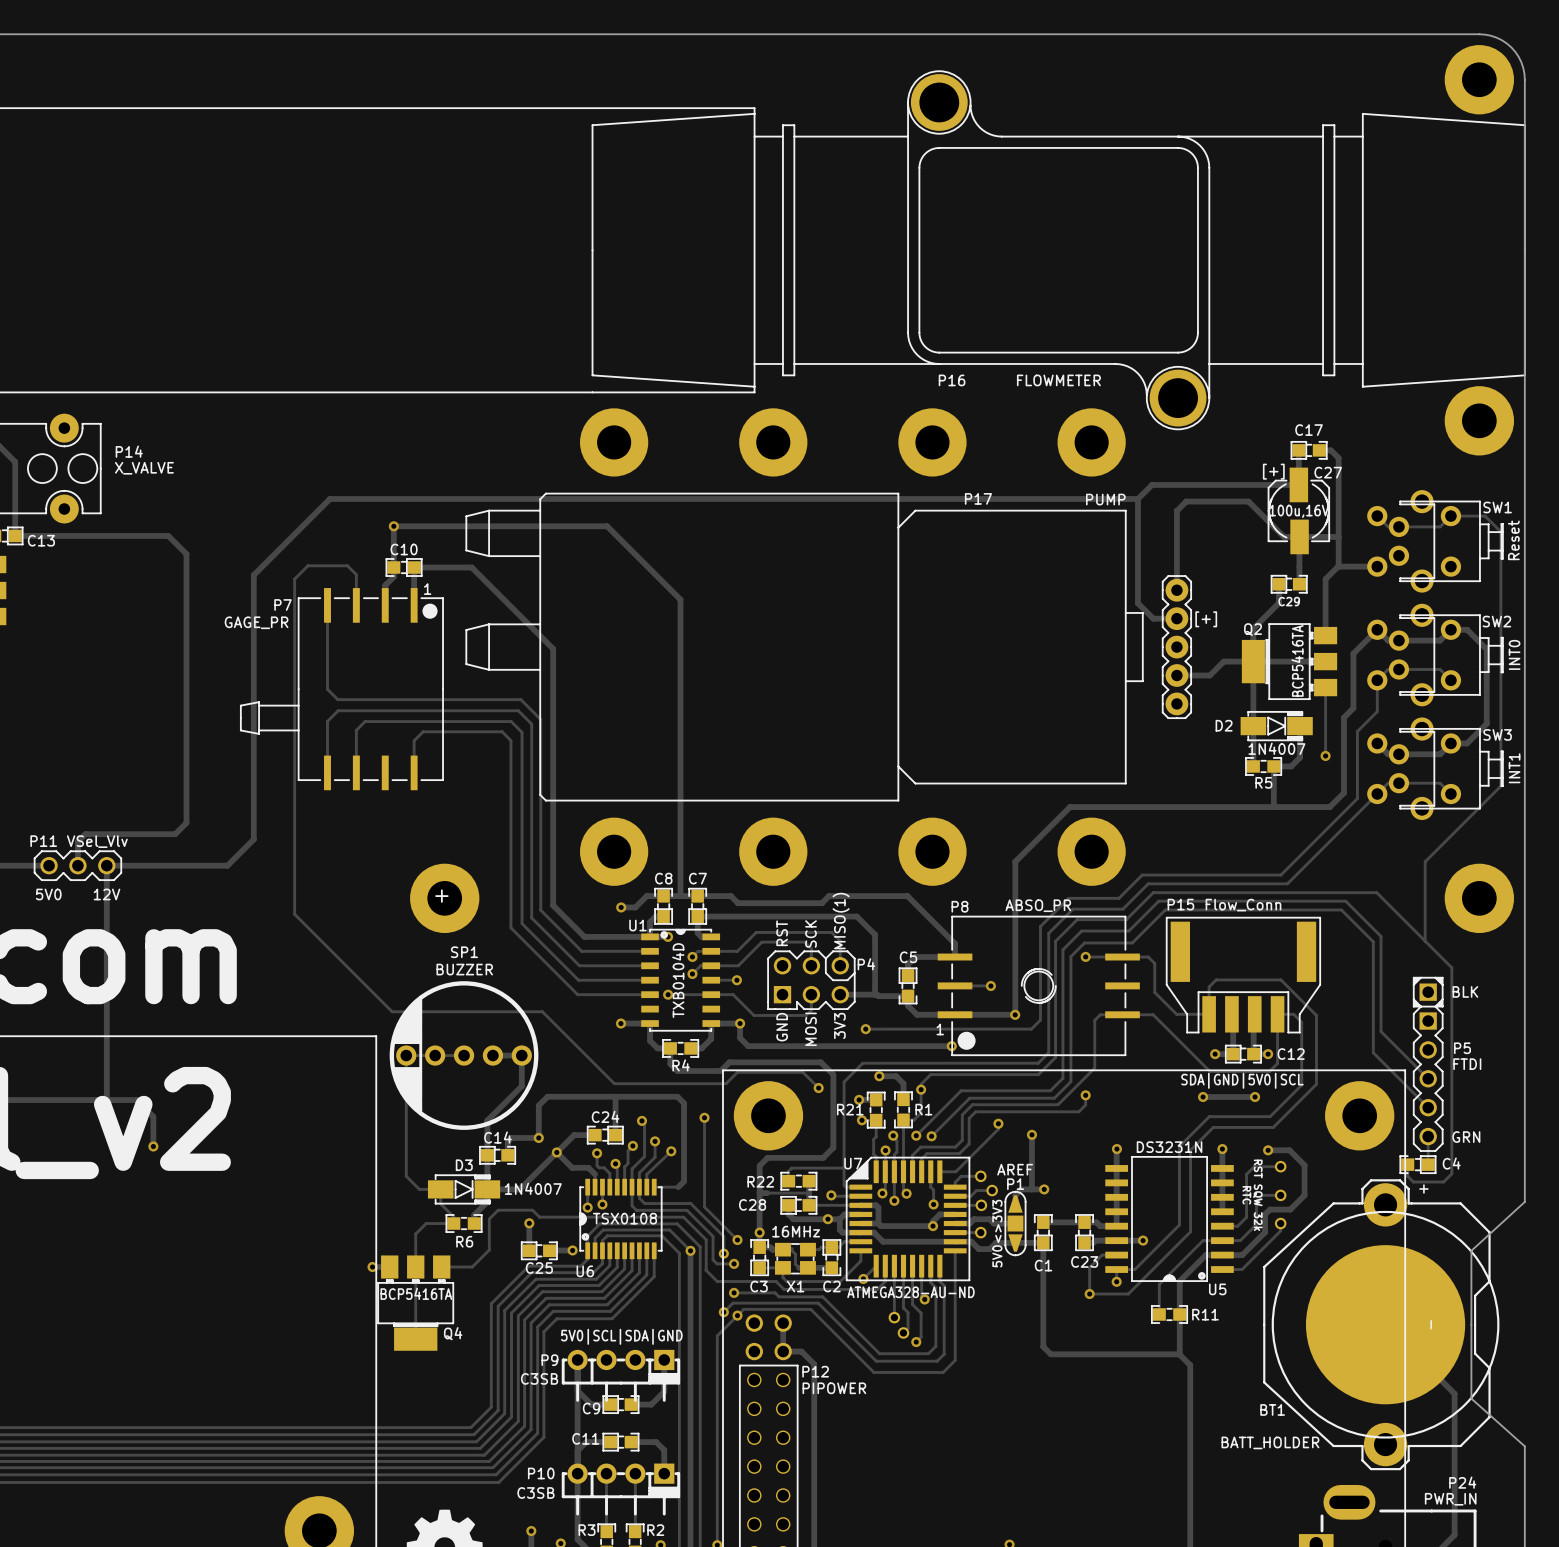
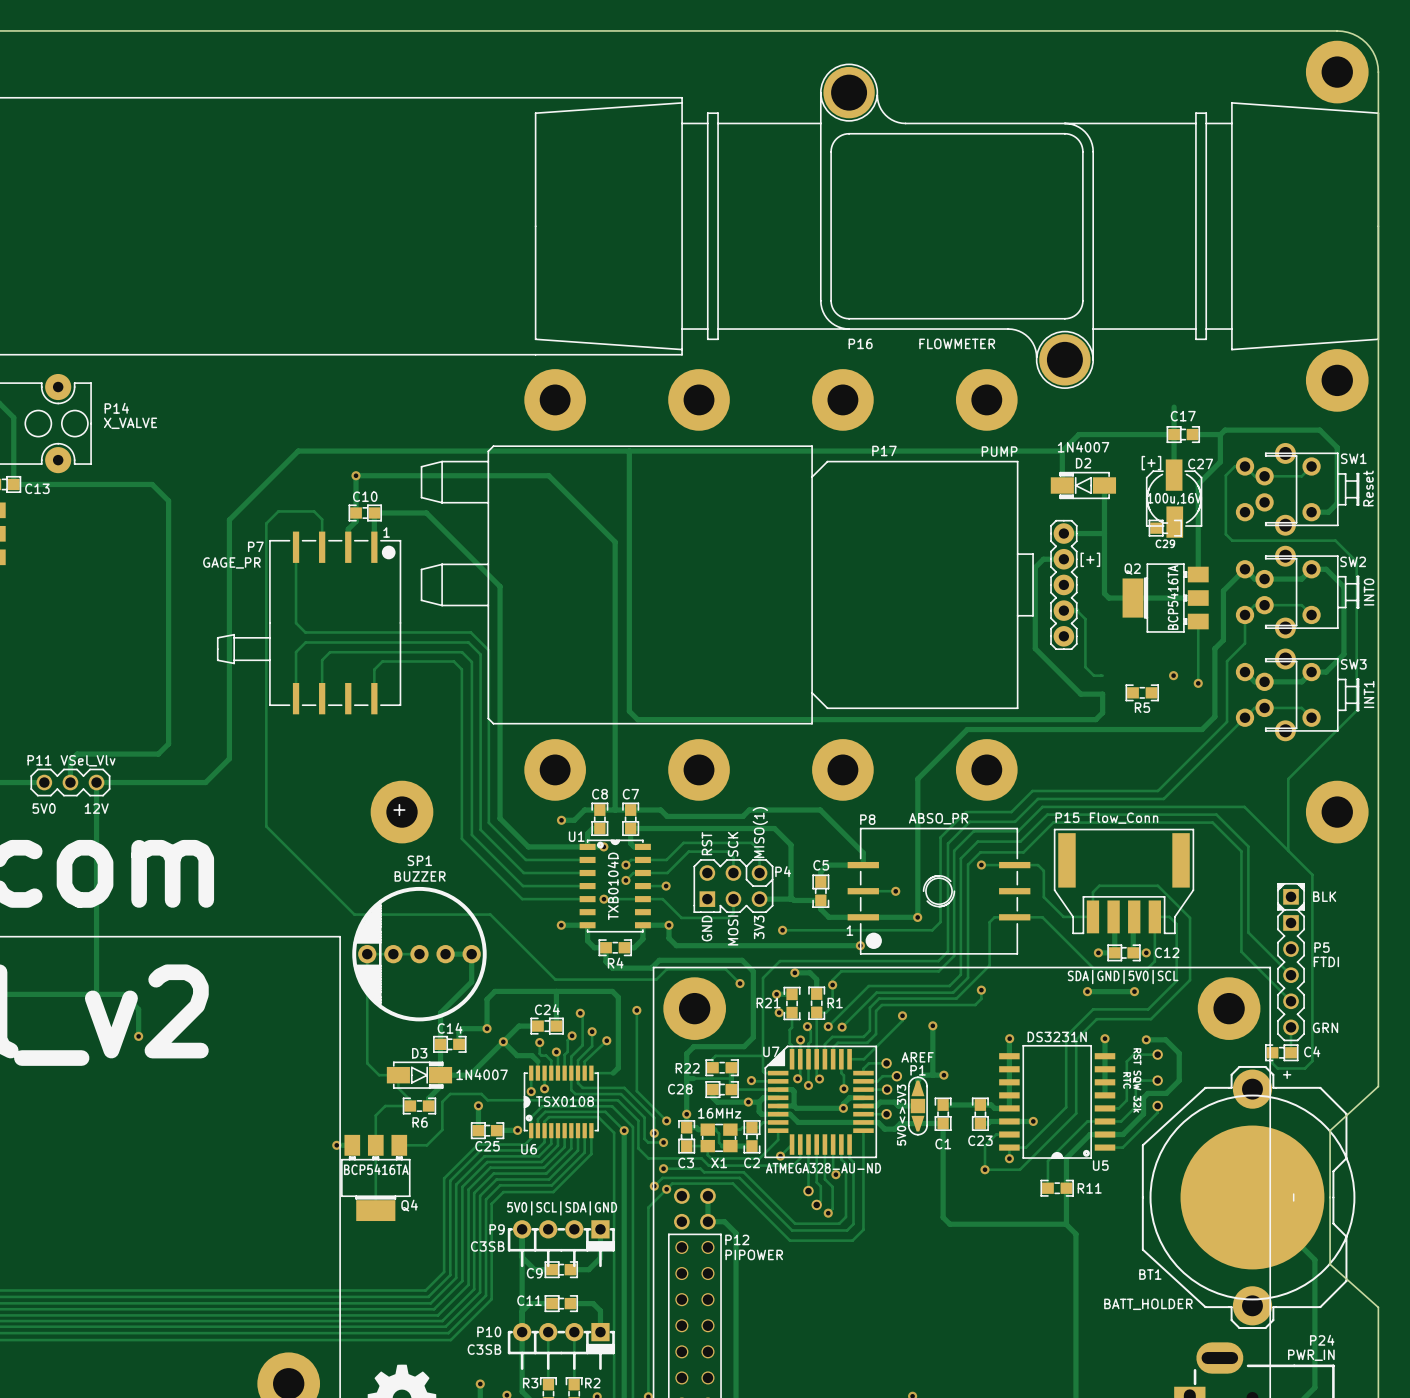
C17 position: (1309, 450) -> (1183, 434)
track: (1319, 450) (1330, 450) (1338, 458) (1338, 566) -> none
track: none -> (1192, 434) (1220, 434) (1225, 430) (1319, 430) (1337, 447) (1337, 503) (1328, 512) (1311, 512)
track: (1298, 484) (1152, 484) (1137, 498) (1137, 603) (1154, 618) -> (629, 451) (629, 711) (637, 719) (1095, 719) (1102, 712) (1102, 694) (1080, 694) (1035, 648) (1035, 567) (1043, 559)
track: none -> (1028, 451) (1062, 451)
track: none -> (1062, 451) (1063, 487)
track: none -> (1062, 451) (1078, 434) (1174, 434) (1174, 475)
C27 position: (1298, 510) -> (1174, 498)
track: (1450, 516) (1485, 516) (1500, 531) (1500, 621) -> (1245, 466) (1234, 466) (1225, 475) (1225, 534) (1232, 540) (1335, 540) (1356, 561)
track: (1338, 536) (1283, 536) (1248, 501) (1186, 501) (1176, 510) (1176, 590) -> (1104, 533) (1063, 533)
track: none -> (1104, 485) (1104, 593) (1108, 598)
track: (1299, 537) (1299, 584) -> none
track: (1377, 566) (1338, 566) (1325, 579) -> (1220, 434) (1220, 461) (1198, 484) (1198, 523)
track: (1278, 584) (1278, 603) (1253, 628) (1253, 766) -> none
track: (1226, 661) (1223, 661) (1209, 675) (1191, 675) -> (1102, 675) (1093, 675) (1085, 667) (1085, 619) (1076, 610)
D2 name position: D2 (1224, 725) -> D2 (1083, 463)
D2 rotation: 0° (1276, 726) -> 180° (1083, 485)
D2 position: (1276, 726) -> (1083, 485)
track: (1300, 726) (1300, 757) (1291, 766) (1273, 766) (1273, 807) -> none
via: none -> (1173, 675)

